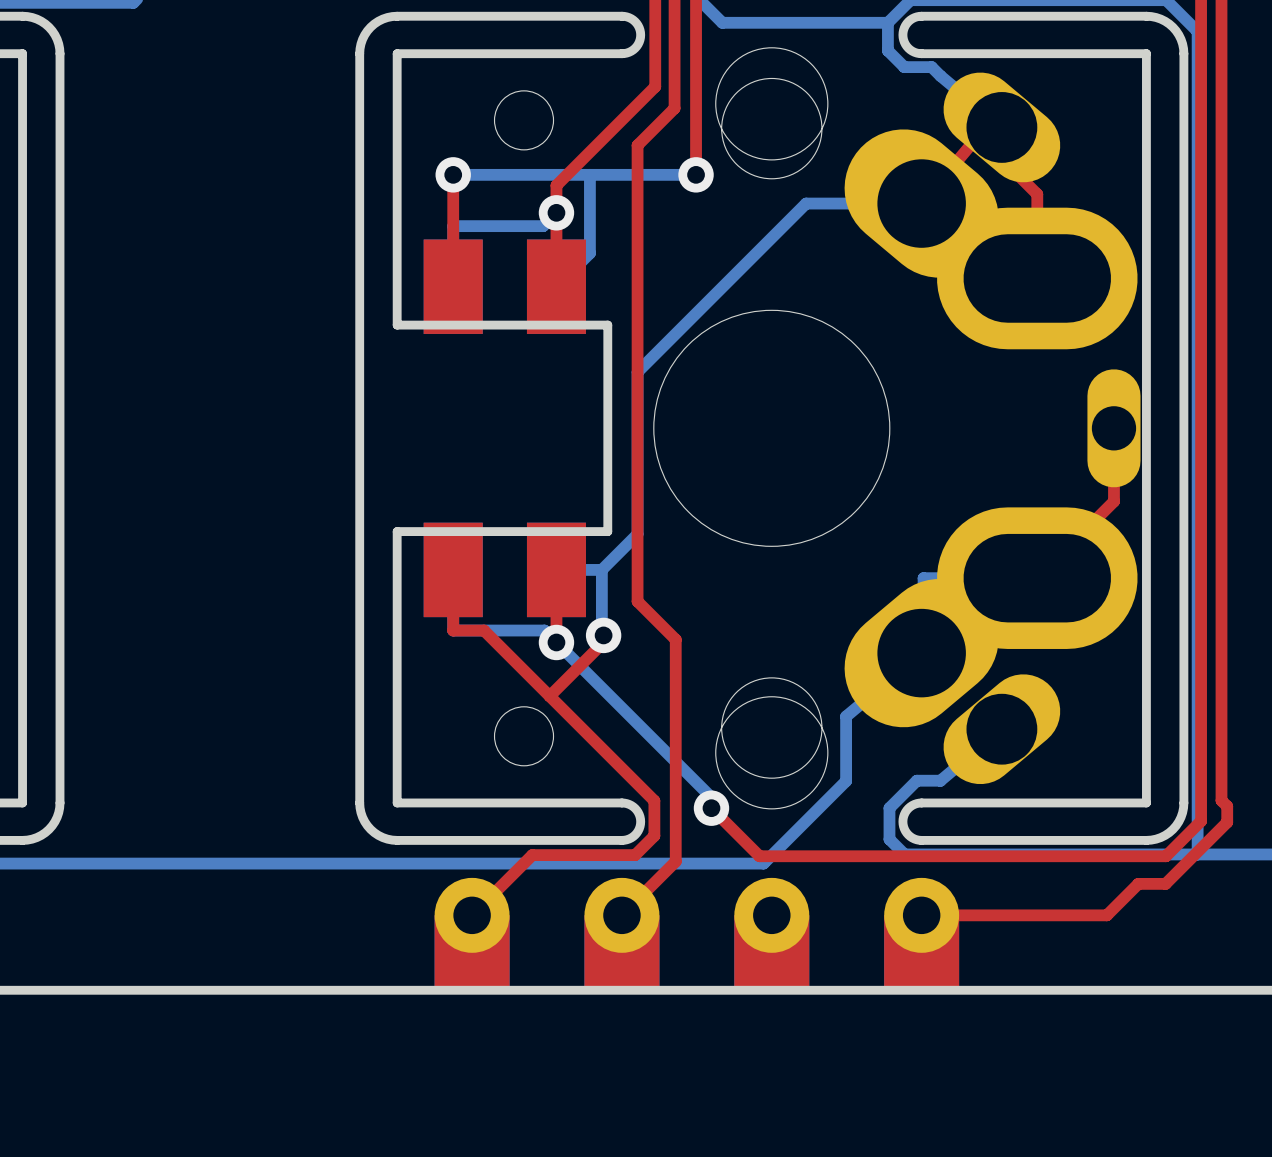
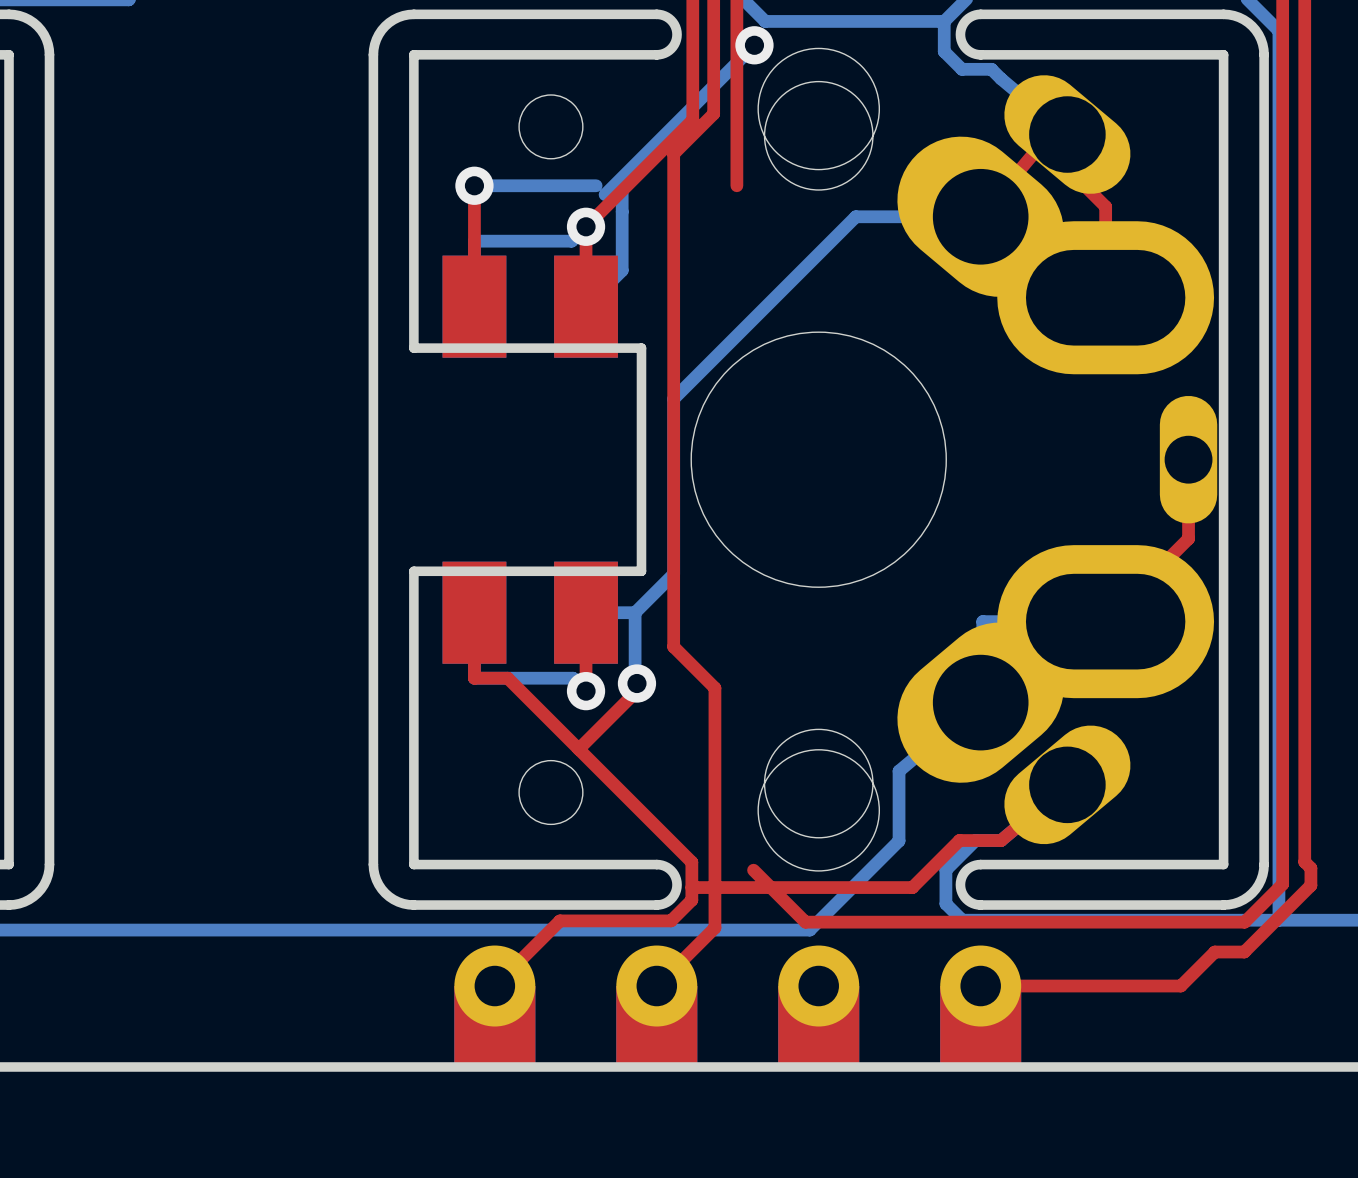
bottom track: none -> (754, 45) (605, 194)
via: none -> (754, 45)
top track: (655, 86) (556, 185) (556, 212) -> (692, 90) (692, 120) (586, 226)
bottom track: (565, 174) (696, 174) -> none
via: (696, 174) -> none
bottom track: (556, 642) (711, 797) (711, 808) -> none
top track: none -> (1067, 784) (1001, 840) (959, 840) (912, 887) (691, 887)
via: (711, 808) -> none

